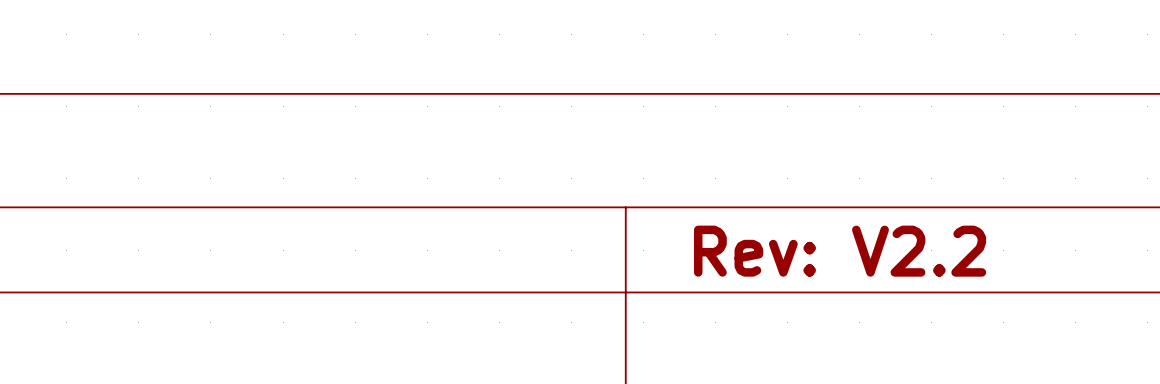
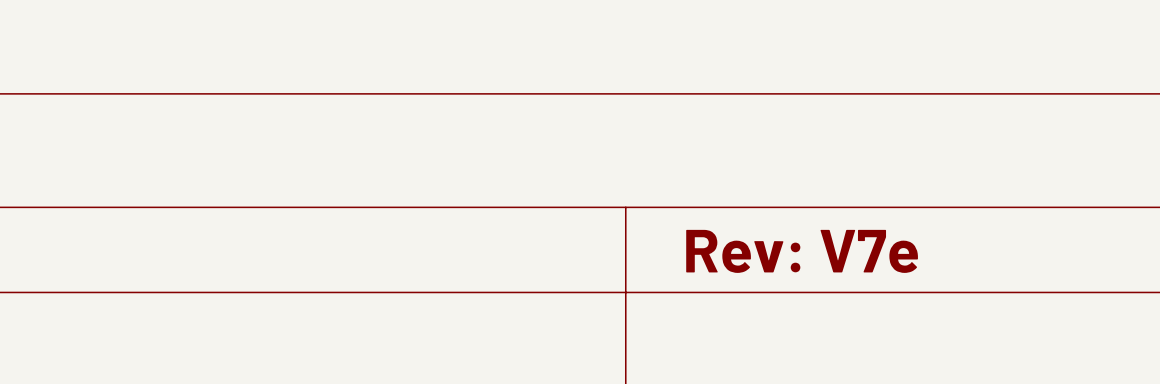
title block: Rev: V2.2 (840, 251) -> Rev: V7e (802, 251)

